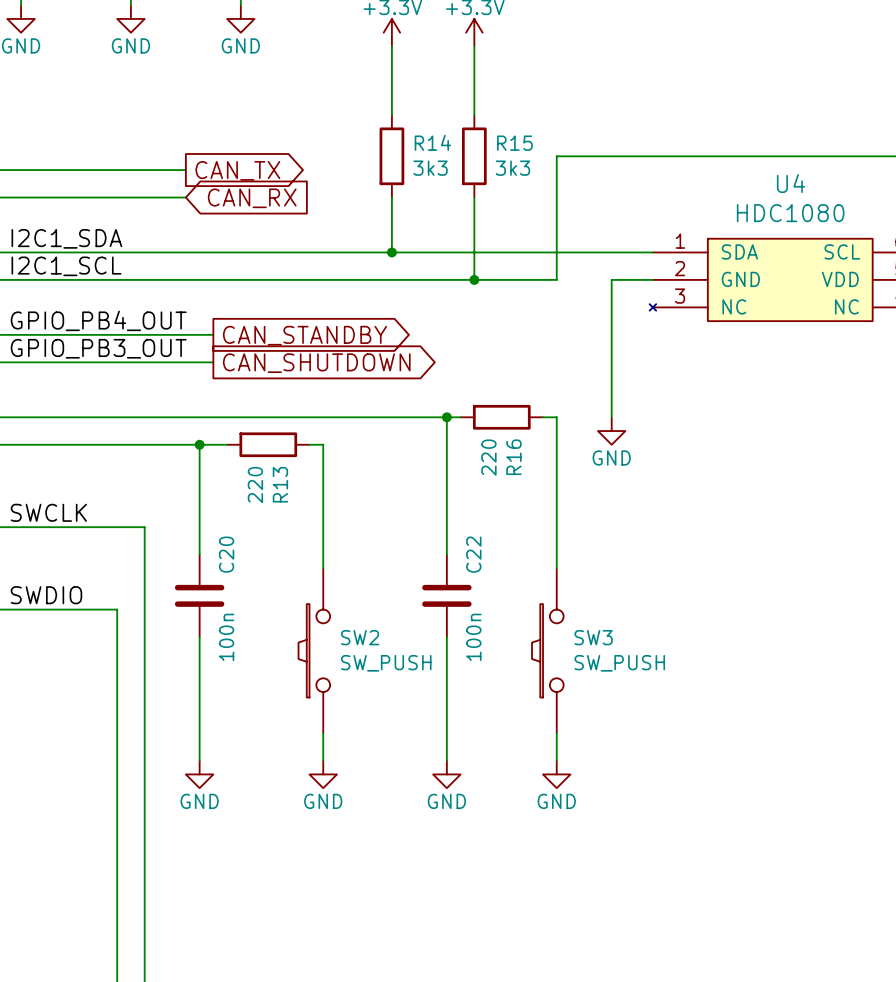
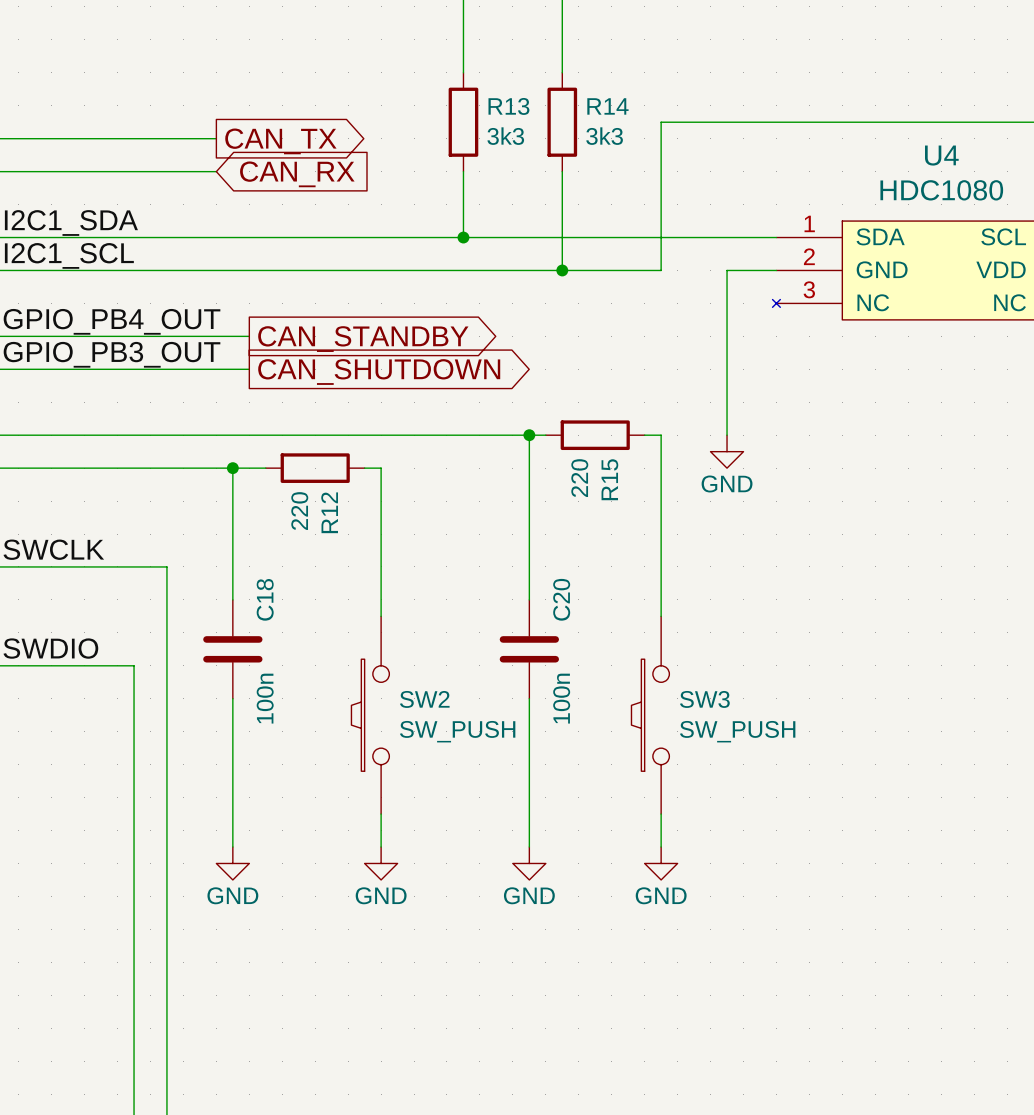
R14 name: R14 (432, 142) -> R13 (508, 106)
R15 name: R15 (514, 143) -> R14 (607, 106)
R16 name: R16 (513, 457) -> R15 (609, 479)
R13 name: R13 (280, 484) -> R12 (329, 512)
C20 name: C20 (226, 554) -> C18 (265, 599)
C22 name: C22 (473, 554) -> C20 (561, 599)

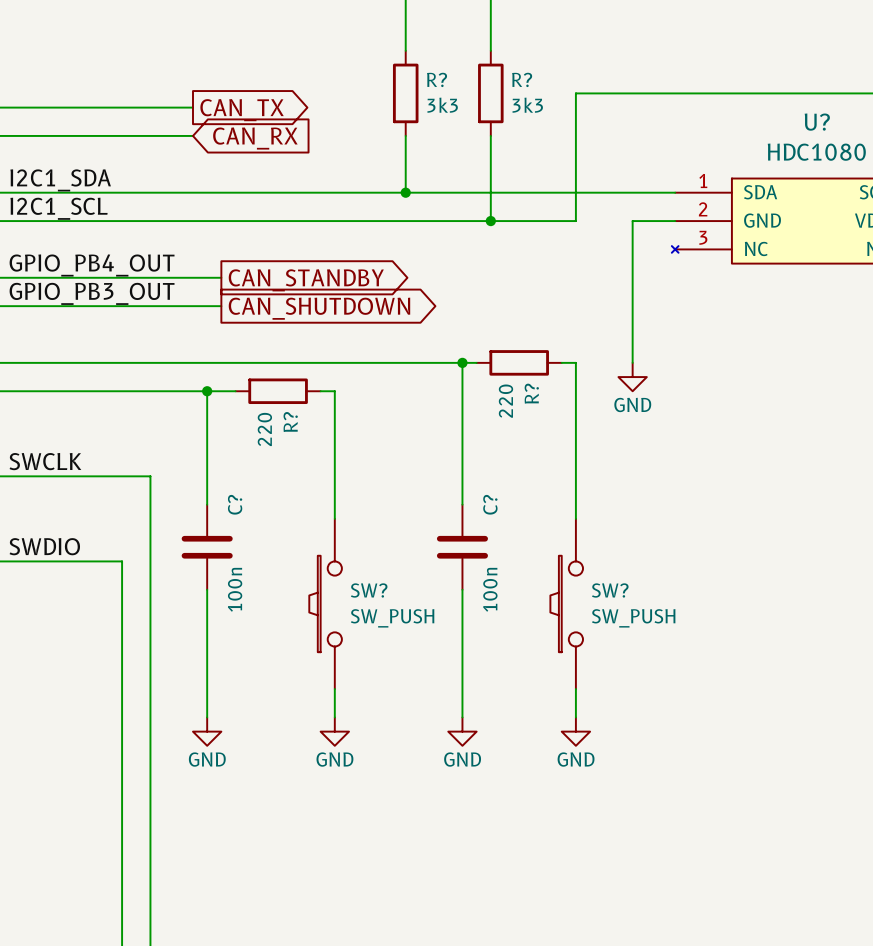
R13 name: R13 (508, 106) -> R? (437, 79)
R14 name: R14 (607, 106) -> R? (522, 79)
U4 name: U4 (941, 155) -> U? (817, 122)
R15 name: R15 (609, 479) -> R? (531, 393)
R12 name: R12 (329, 512) -> R? (290, 422)
C18 name: C18 (265, 599) -> C? (235, 504)
C20 name: C20 (561, 599) -> C? (490, 504)
SW2 name: SW2 (424, 699) -> SW? (369, 590)
SW3 name: SW3 (704, 699) -> SW? (610, 590)

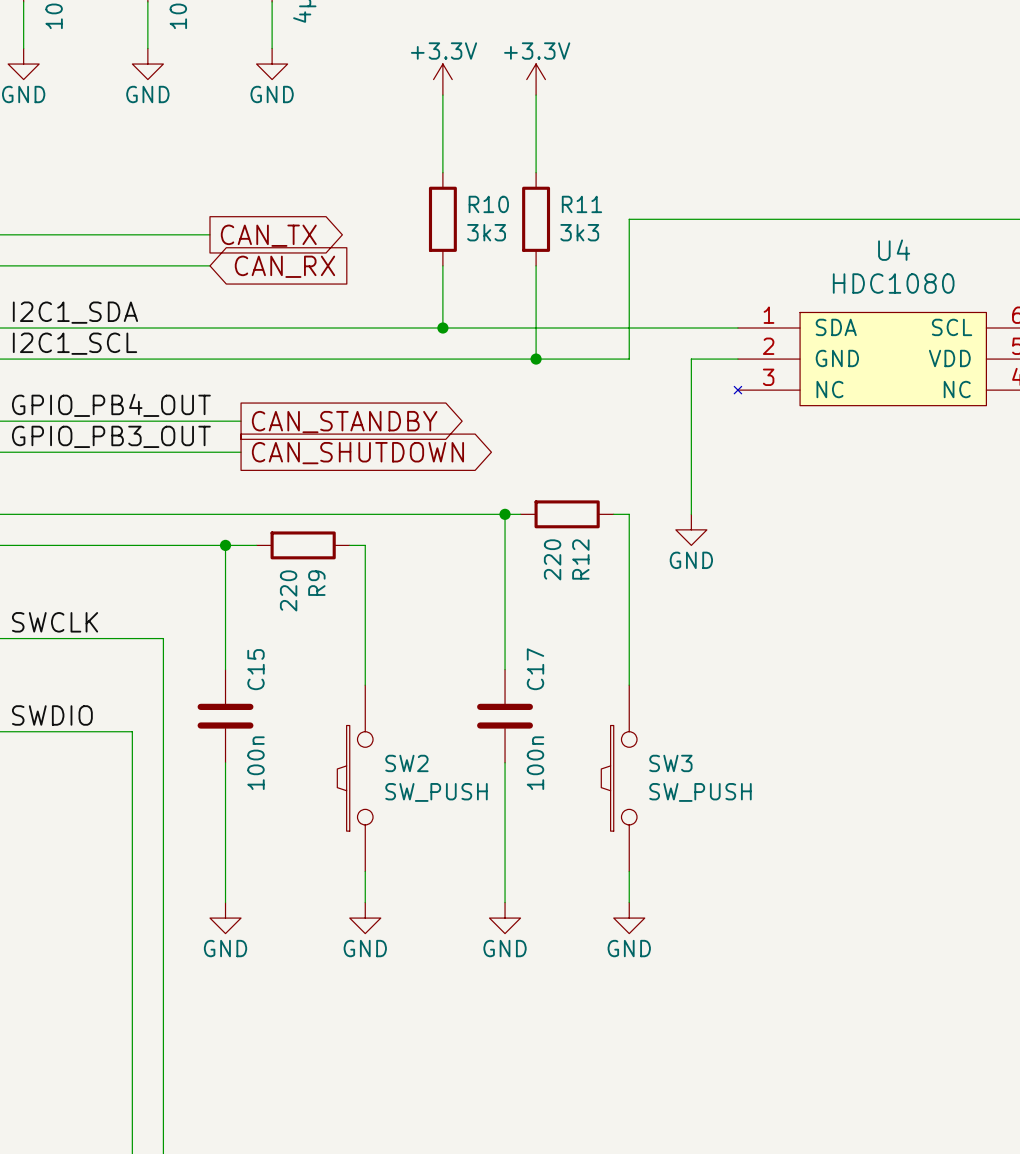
R? name: R? (437, 79) -> R10 (488, 204)
R? name: R? (522, 79) -> R11 (581, 204)
U? name: U? (817, 122) -> U4 (894, 250)
R? name: R? (531, 393) -> R12 (580, 559)
R? name: R? (290, 422) -> R9 (316, 583)
C? name: C? (235, 504) -> C15 (255, 669)
C? name: C? (490, 504) -> C17 (535, 669)
SW? name: SW? (369, 590) -> SW2 (406, 763)
SW? name: SW? (610, 590) -> SW3 (670, 763)

